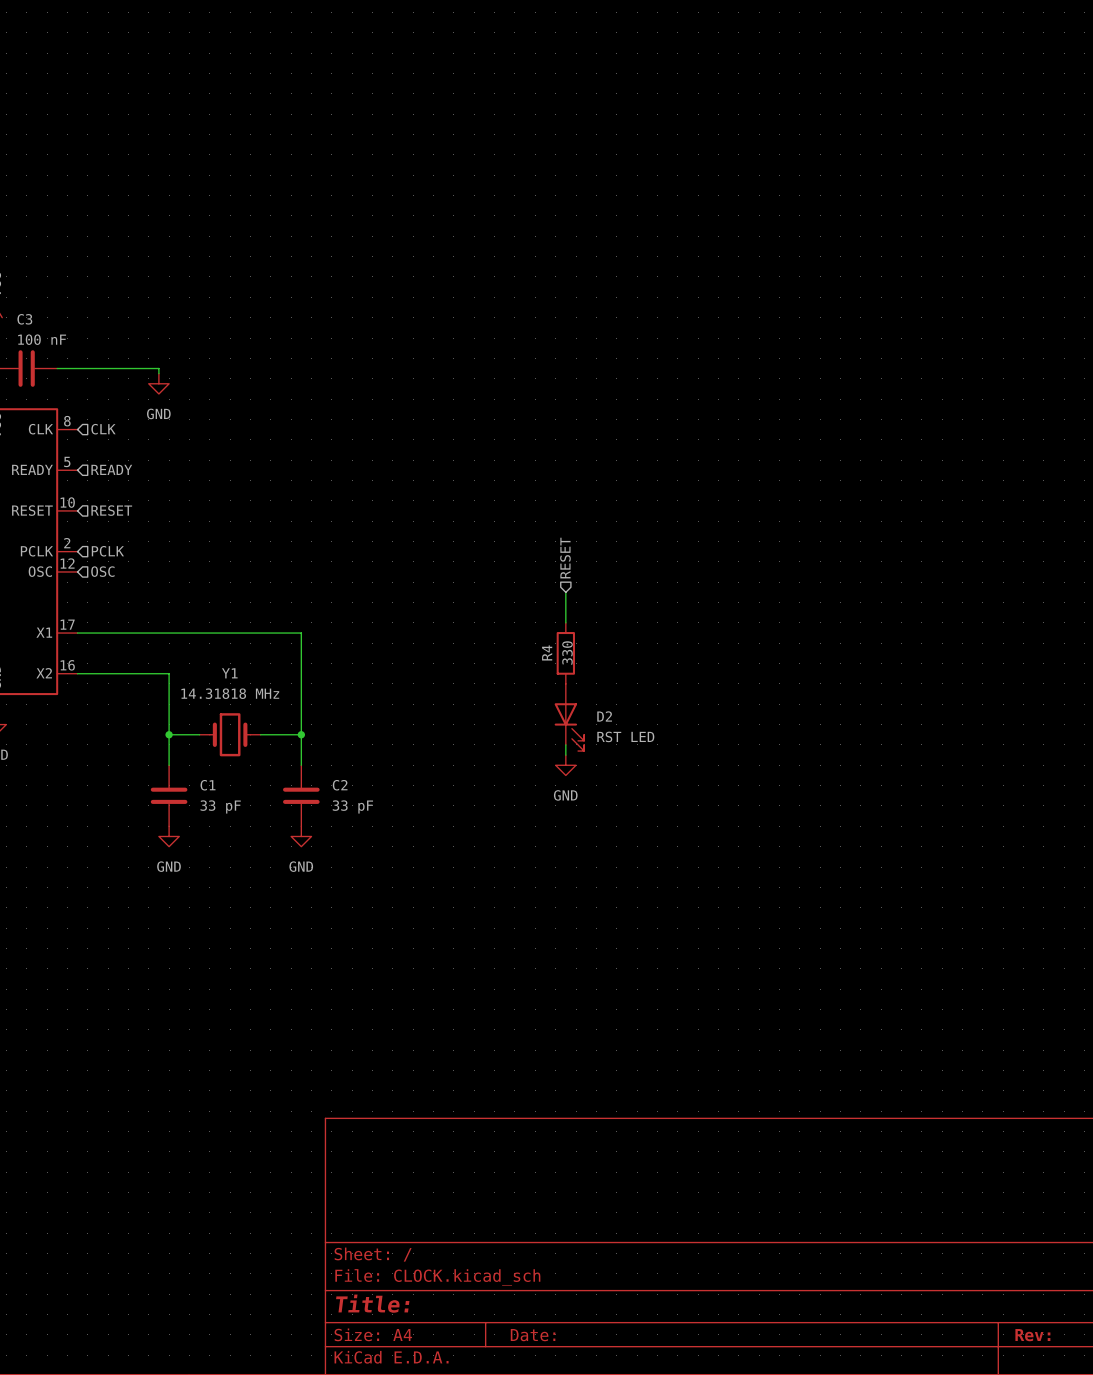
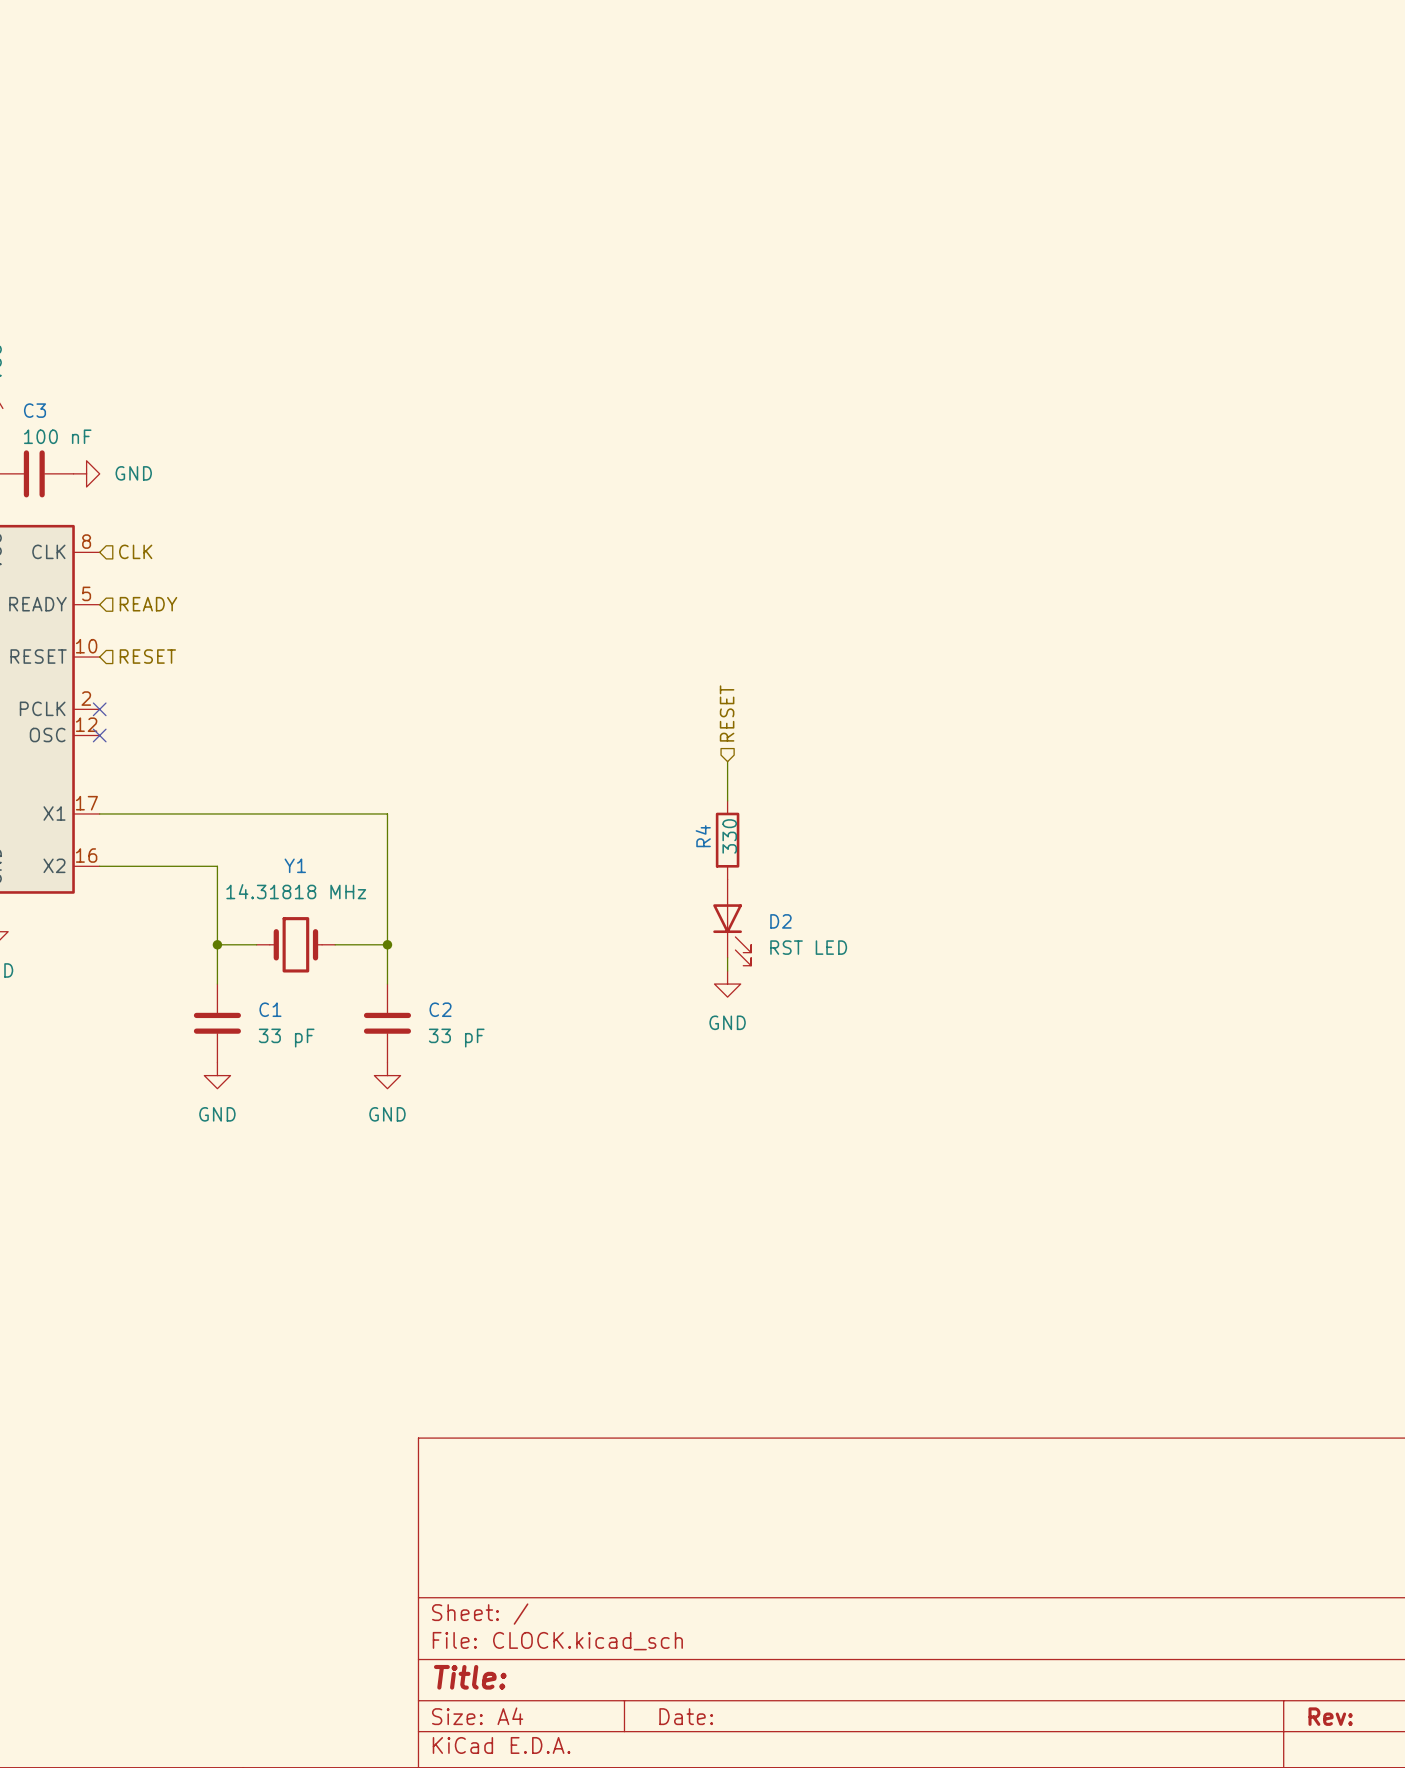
wire: (57, 368) (158, 368) (158, 373) -> none
power symbol rotation: 0° (158, 383) -> 90° counterclockwise (86, 473)
power symbol position: GND (158, 383) -> GND (86, 473)
no-connect mark: none -> (99, 709)
hierarchical label: PCLK (107, 551) -> none
no-connect mark: none -> (99, 735)
hierarchical label: OSC (102, 571) -> none

